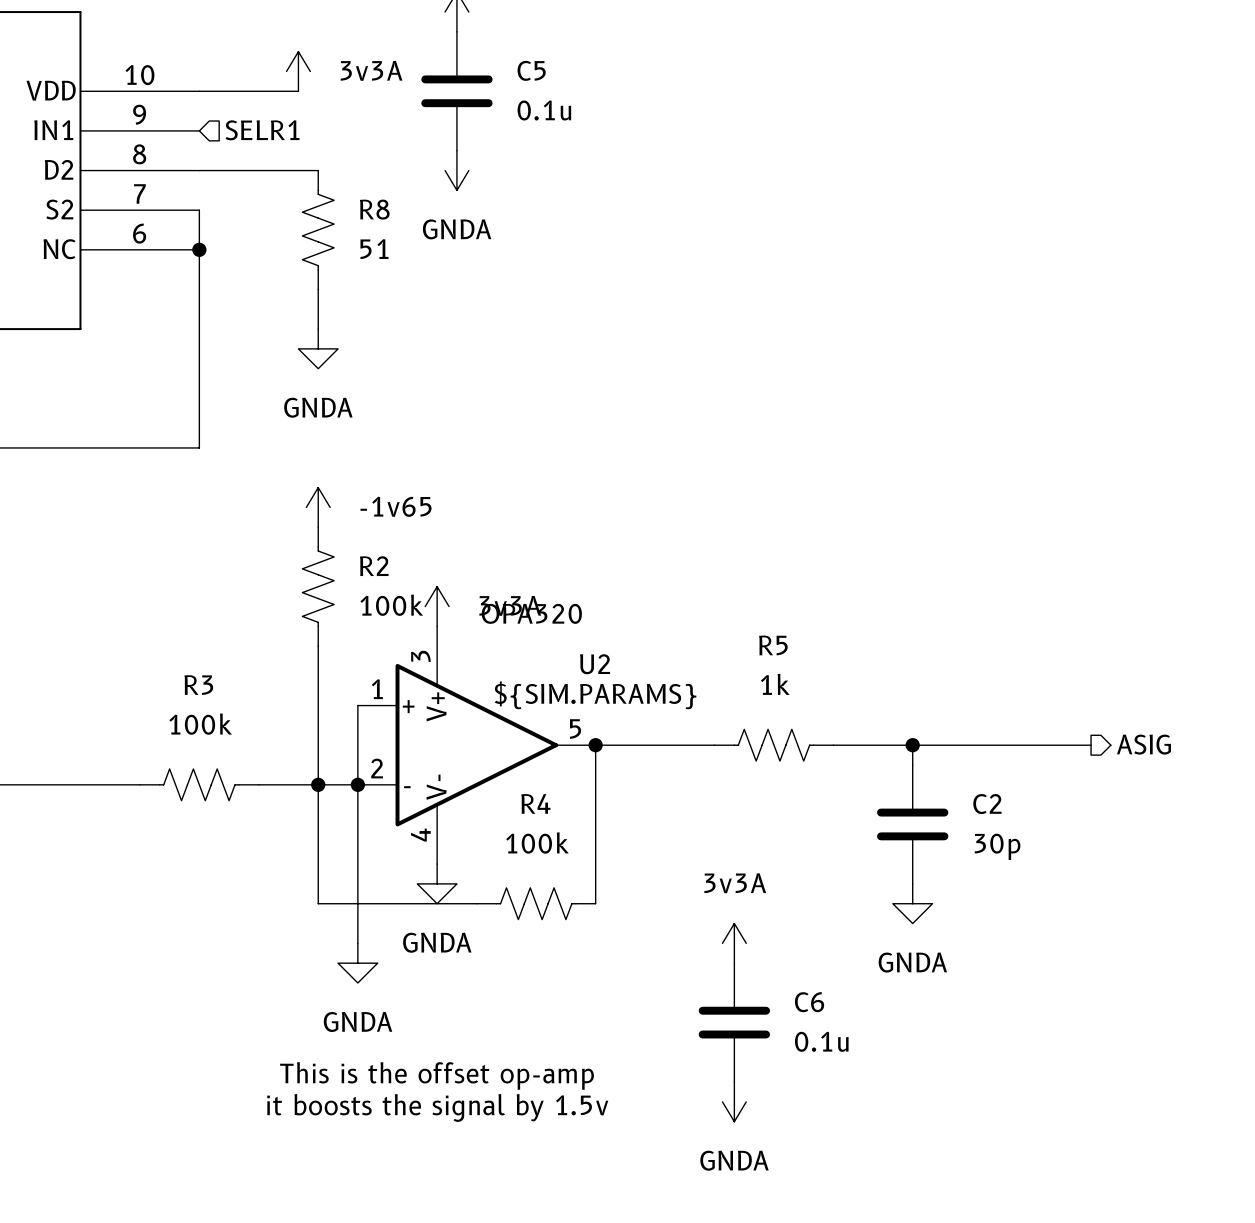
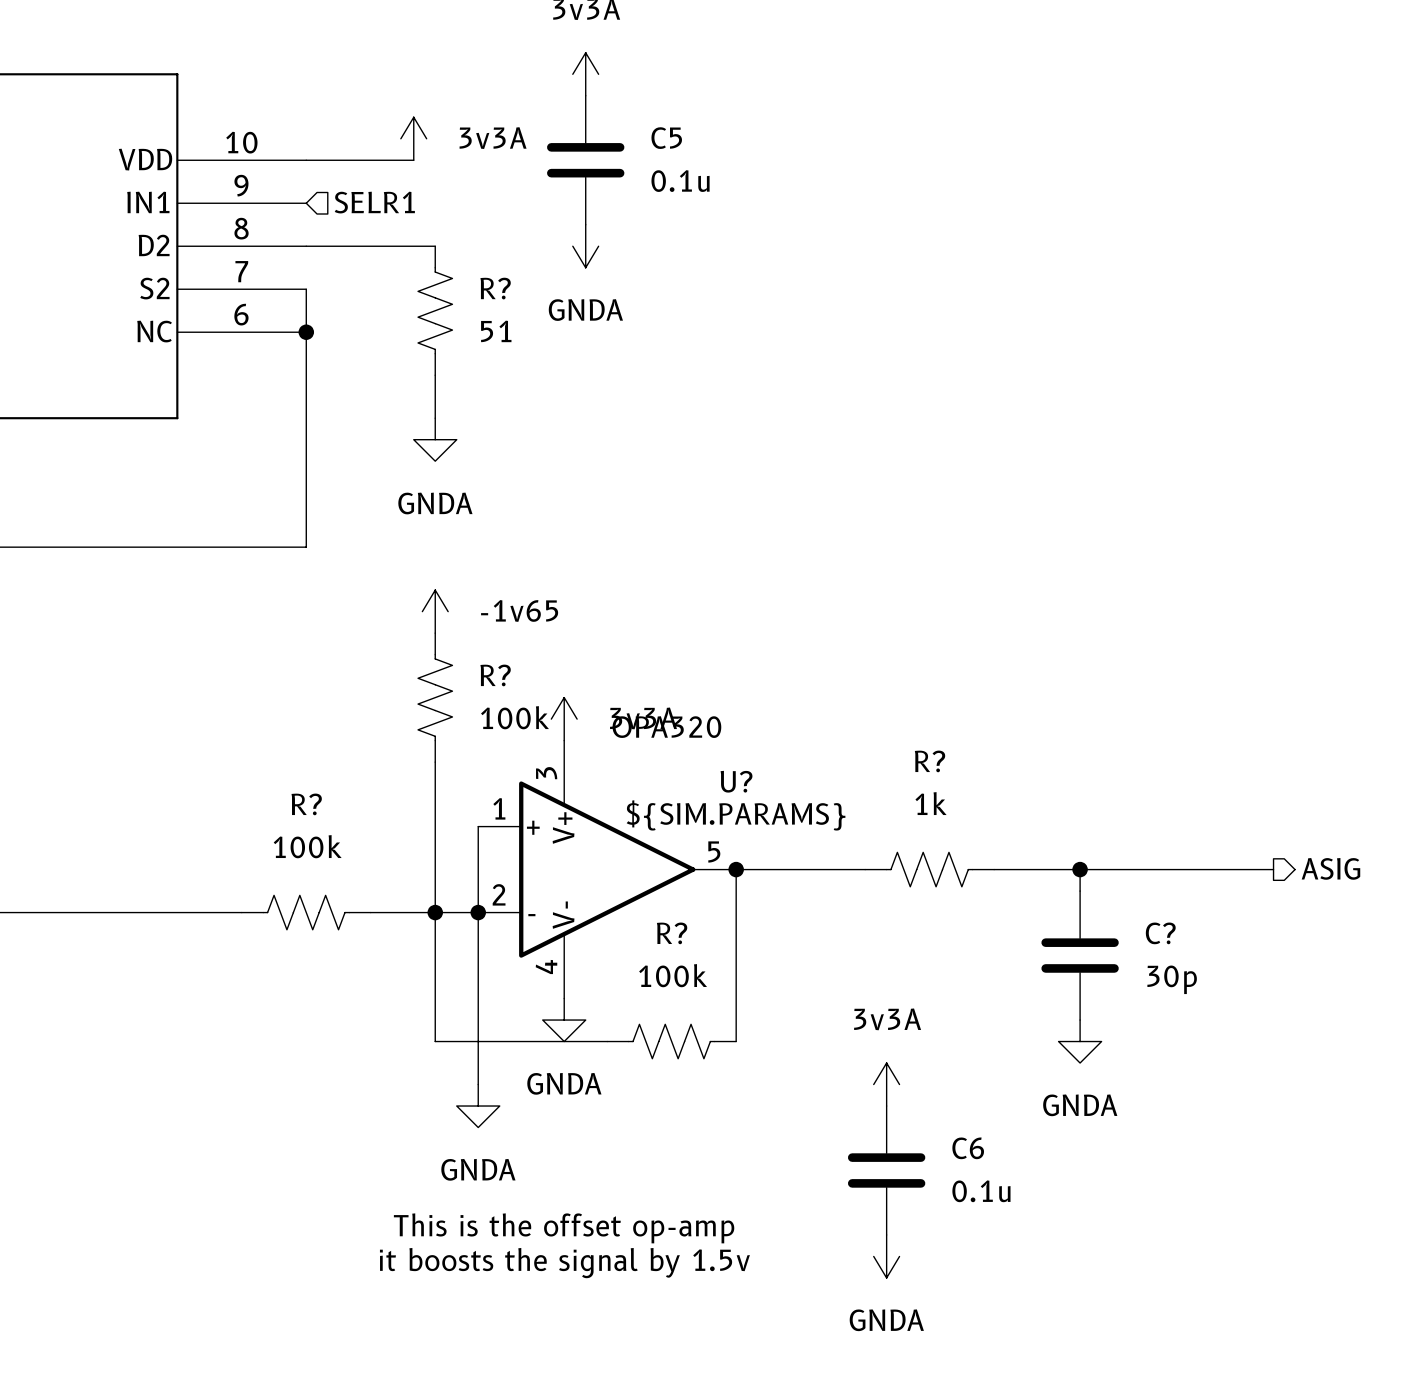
R8 name: R8 (374, 209) -> R? (495, 288)
R2 name: R2 (374, 566) -> R? (495, 675)
R5 name: R5 (773, 645) -> R? (930, 761)
U2 name: U2 (595, 664) -> U? (736, 781)
R3 name: R3 (198, 685) -> R? (306, 804)
R4 name: R4 (535, 803) -> R? (672, 933)
C2 name: C2 (987, 804) -> C? (1160, 933)

